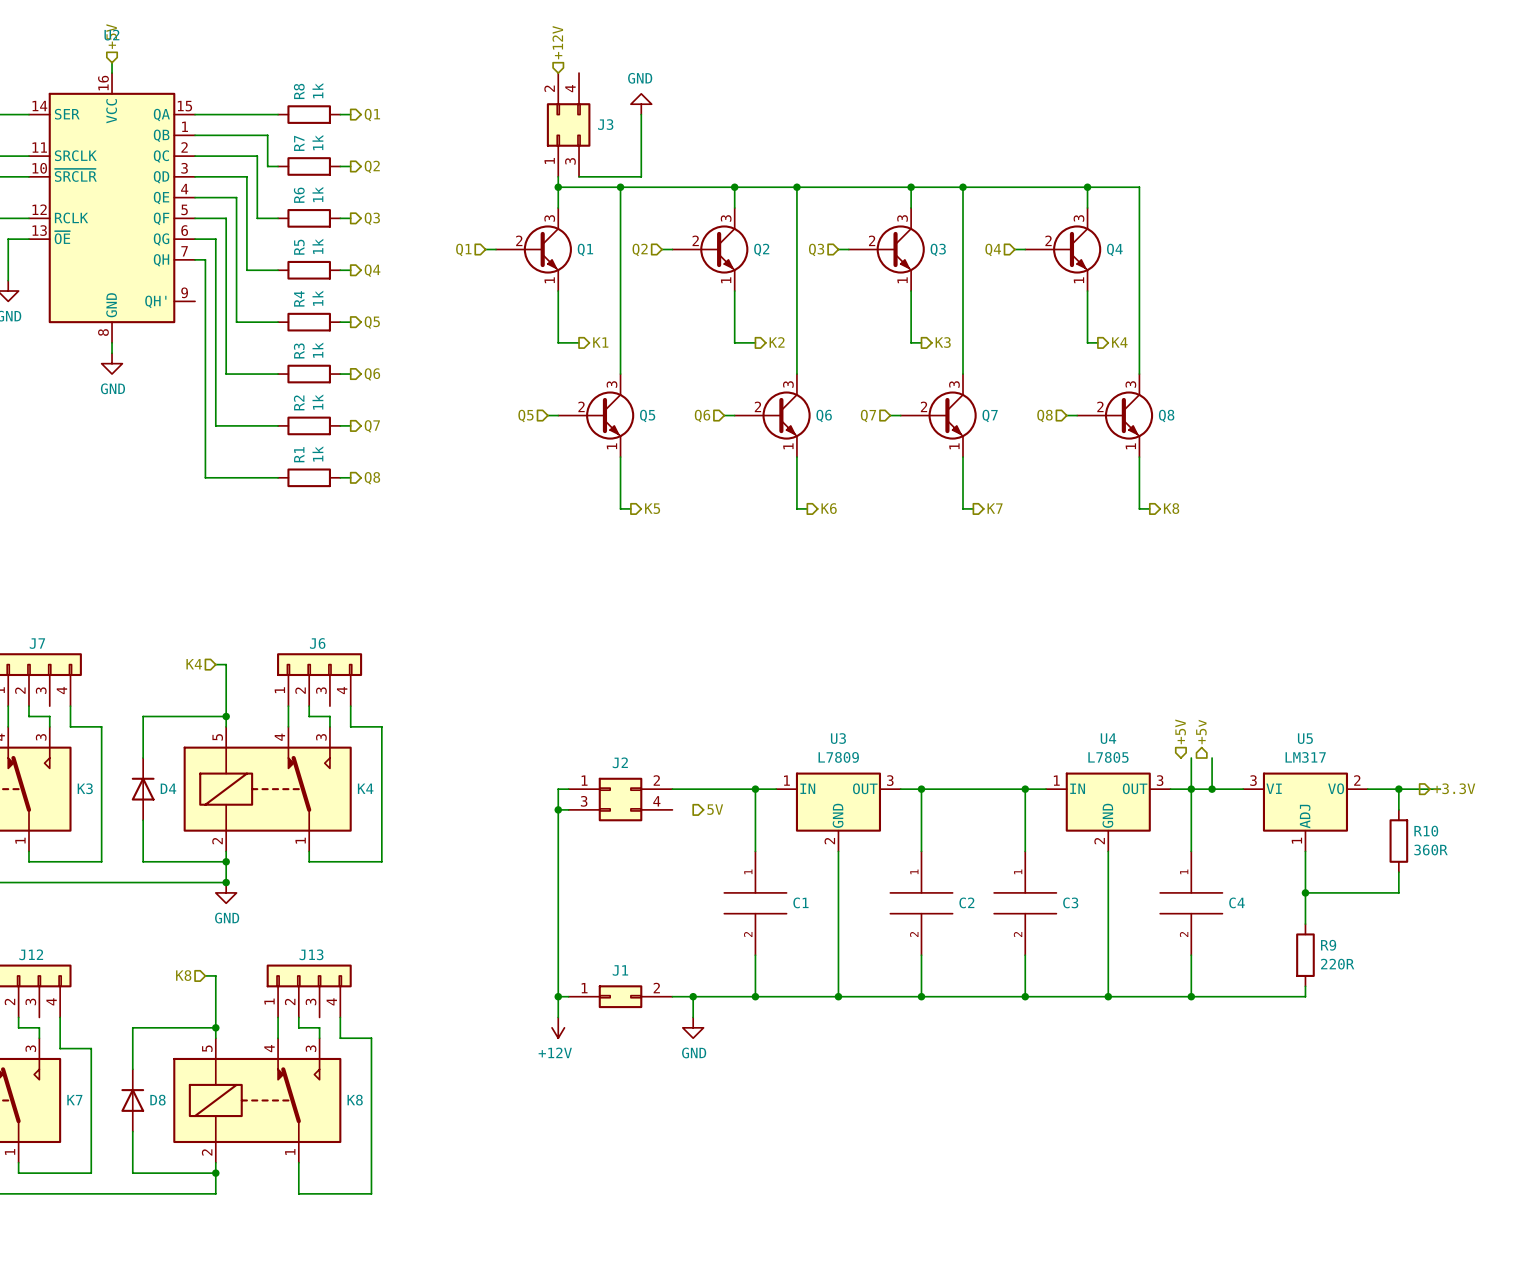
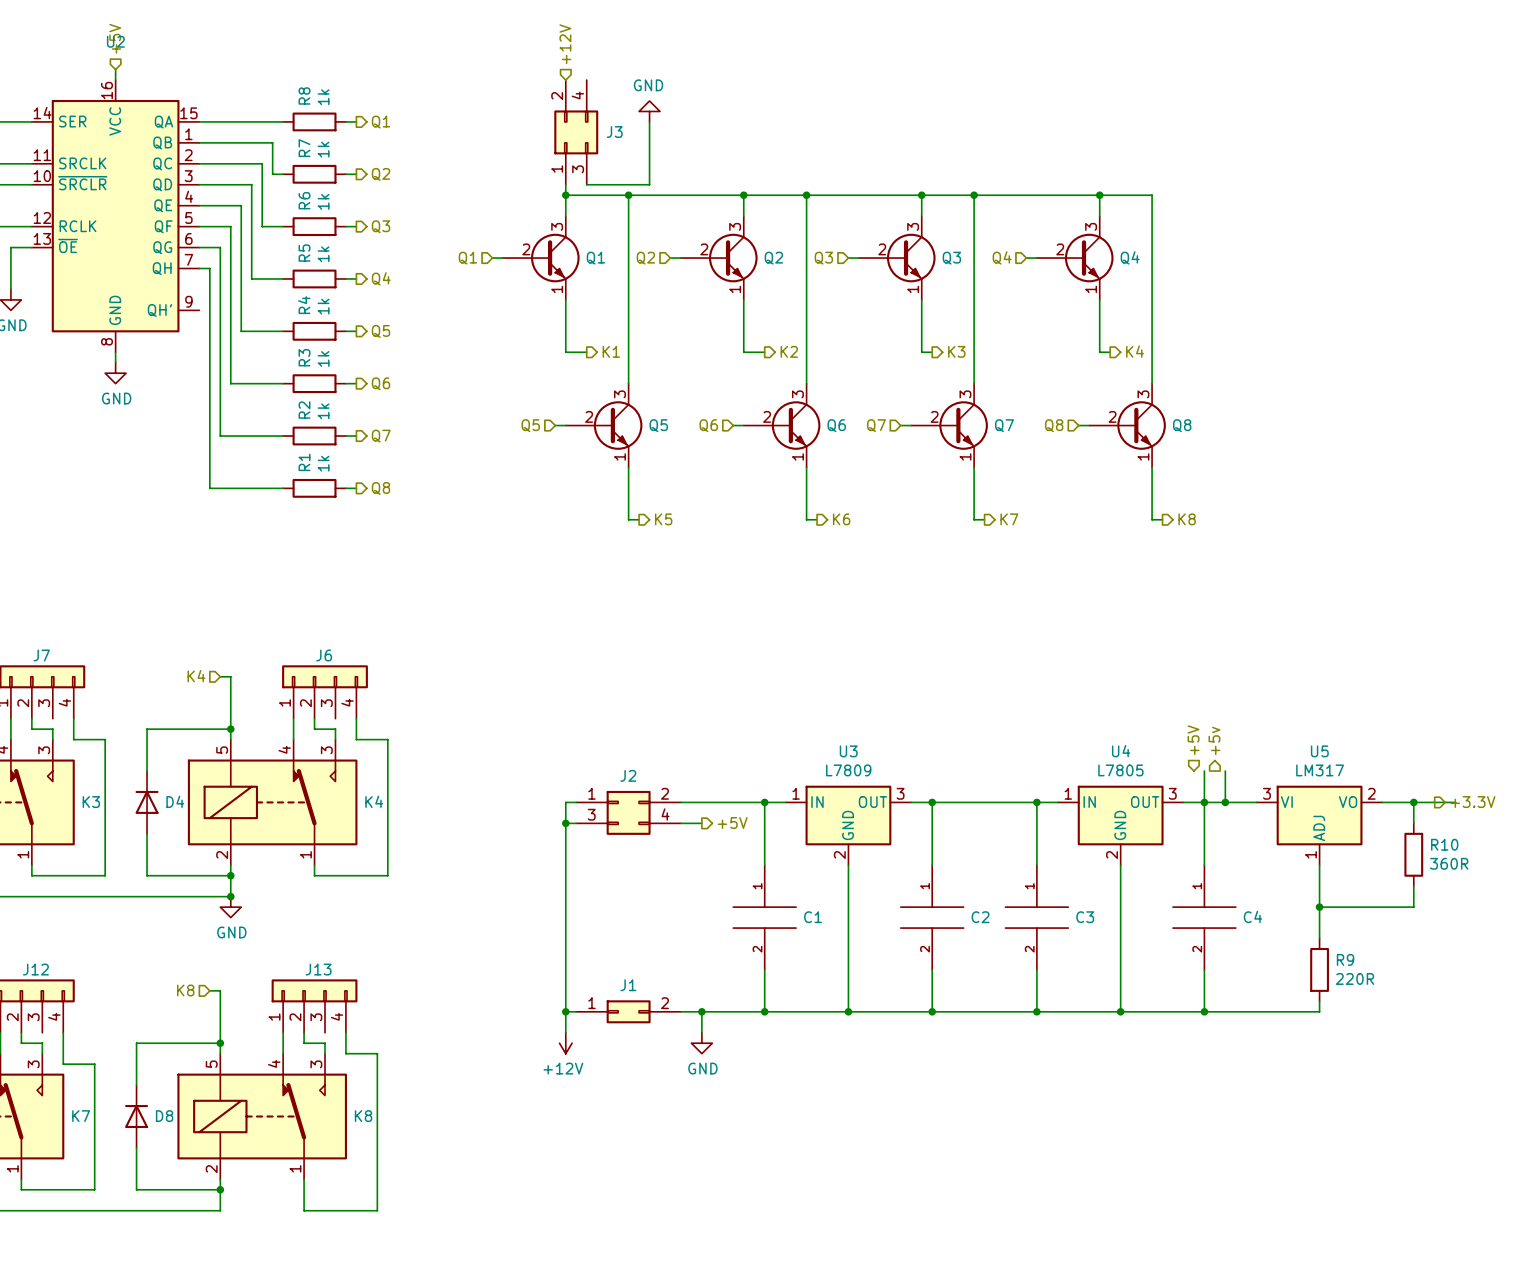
wire: none -> (680, 823) (701, 823)
hierarchical label: 5V (715, 809) -> +5V (732, 822)

